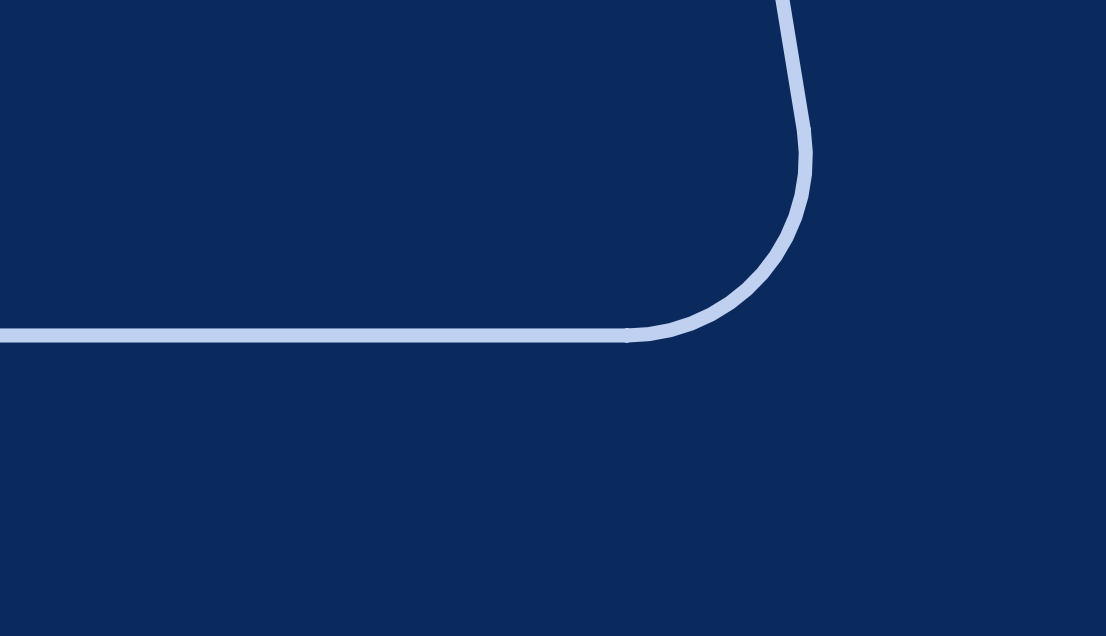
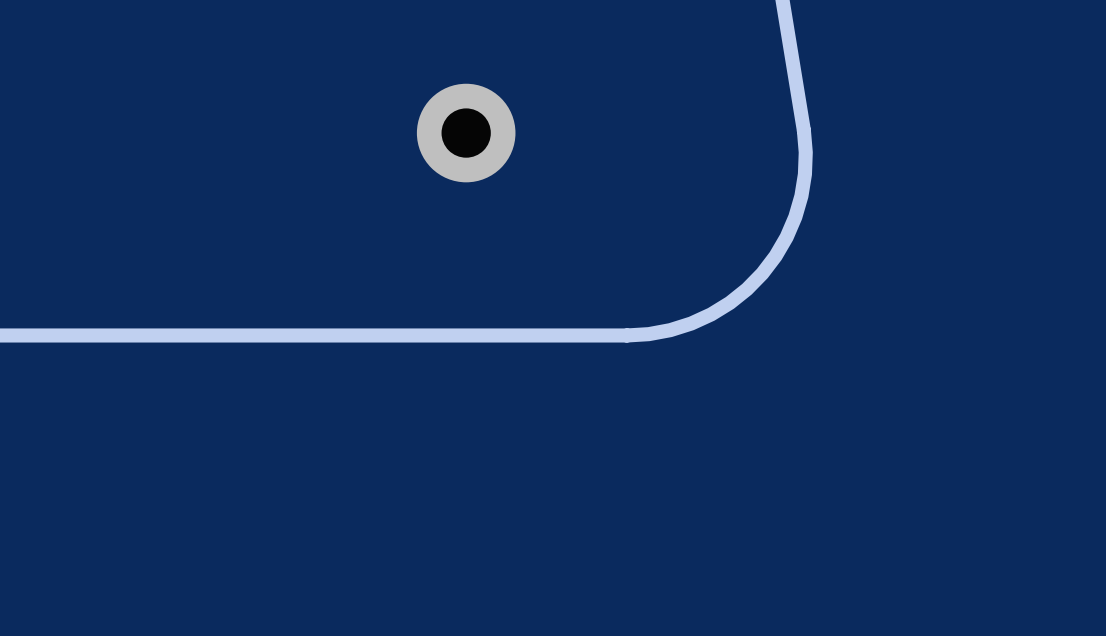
via: none -> (466, 133)

